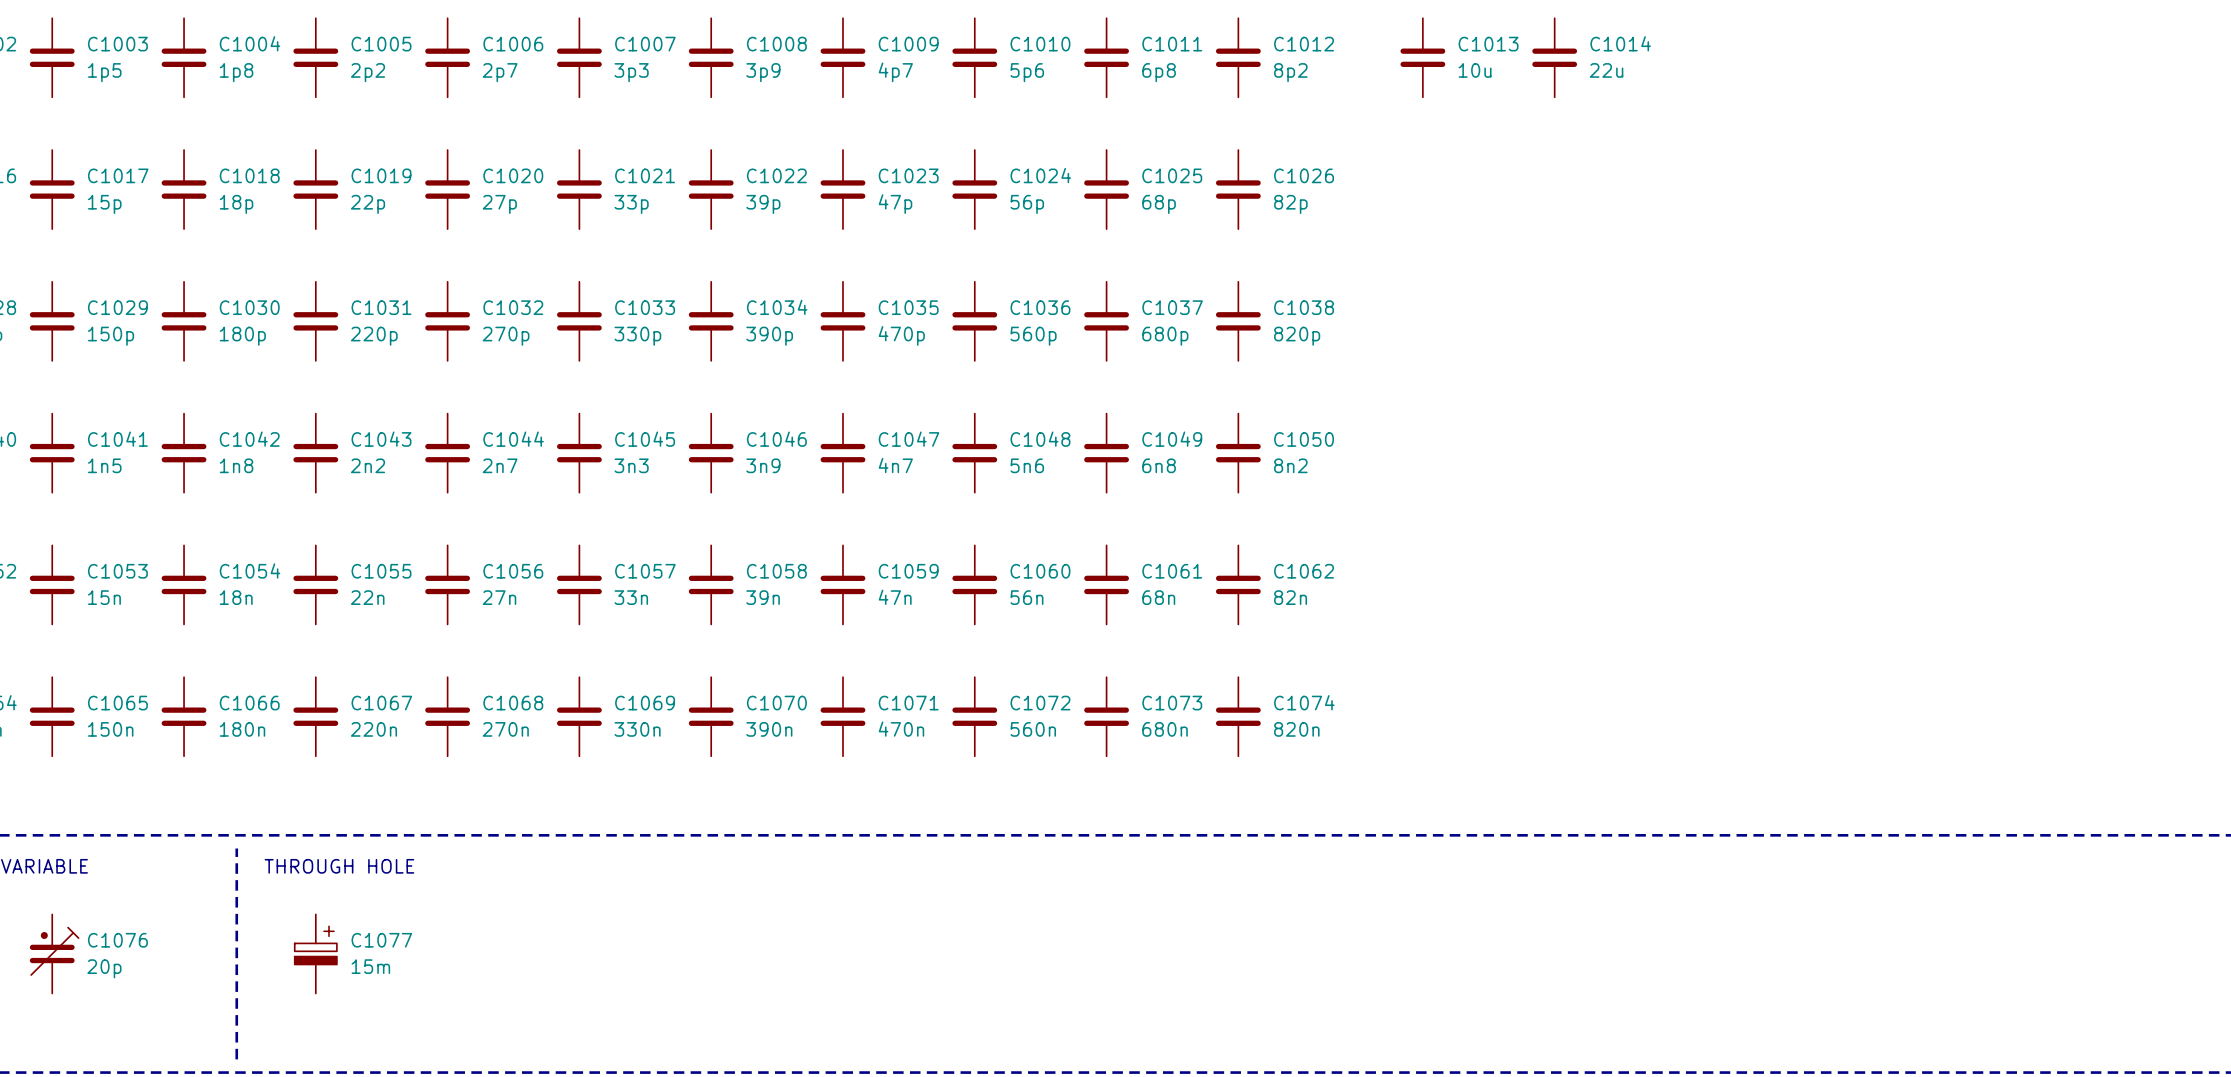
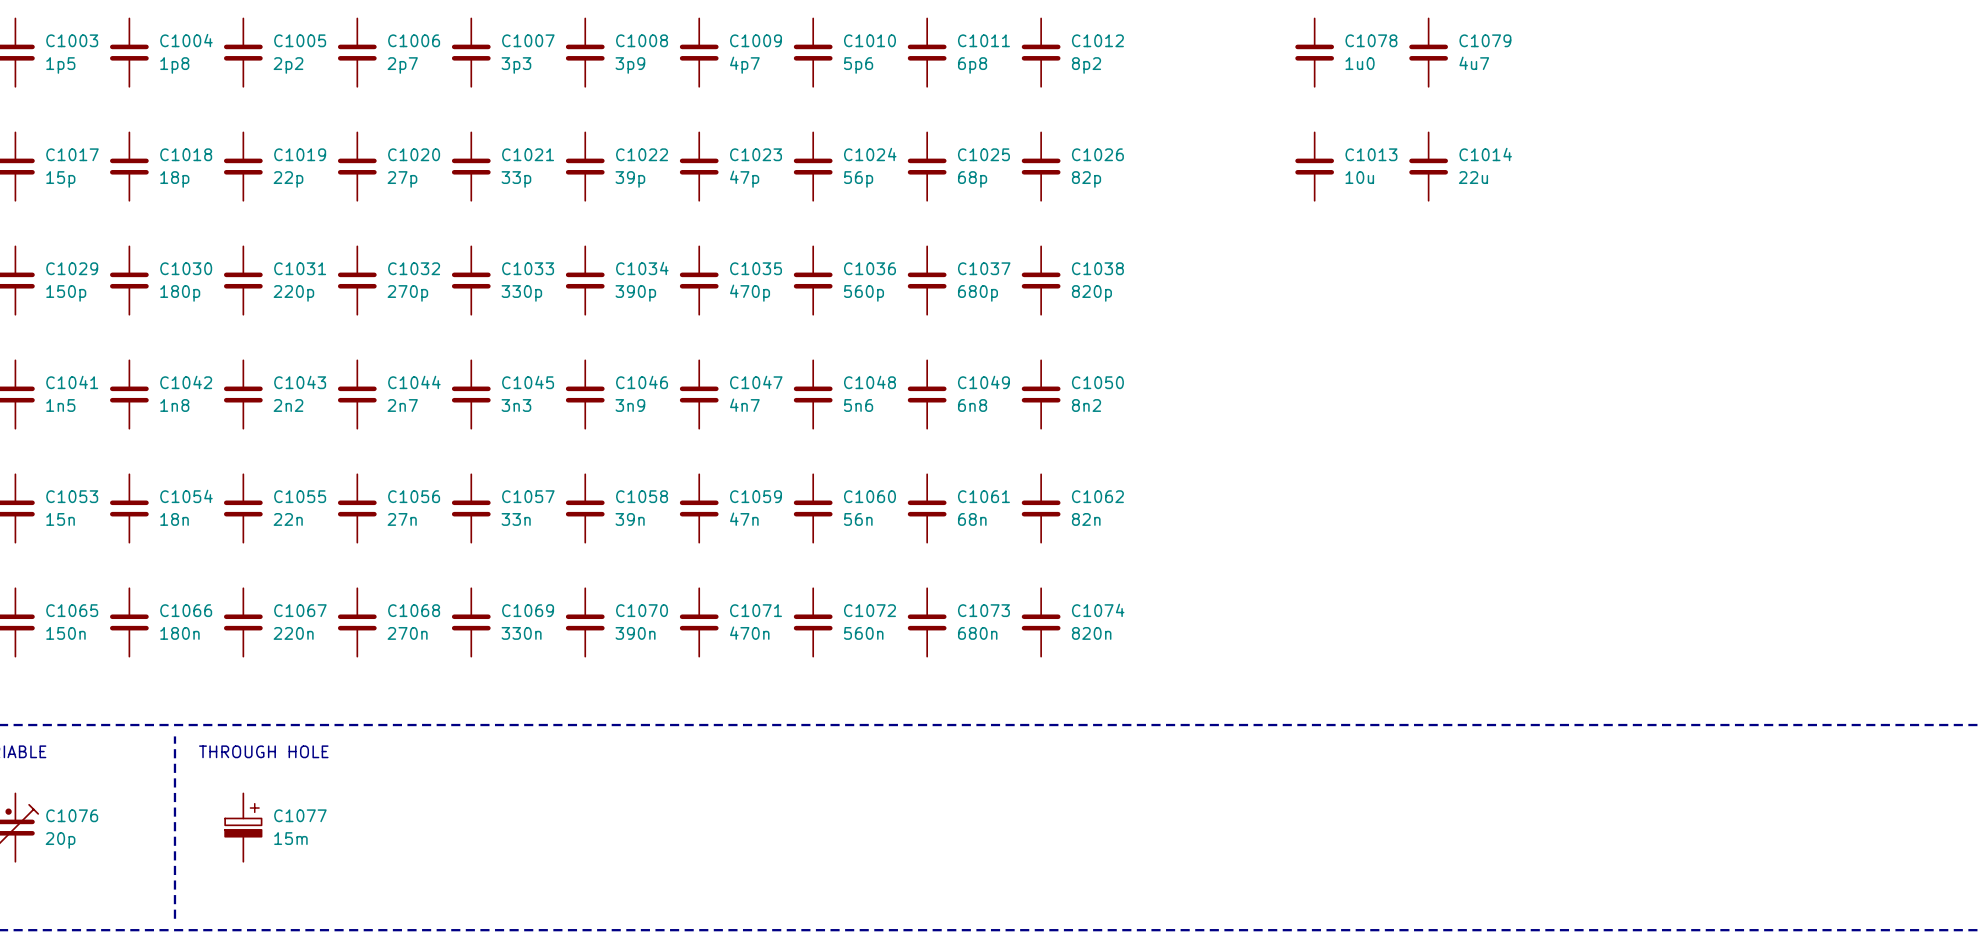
C1014 name: C1014 (1620, 43) -> C1078 (1371, 40)
C1013 position: (1422, 57) -> (1314, 166)
C1079: none -> 4u7 (1428, 52)
C1014 value: 22u (1606, 70) -> 1u0 (1360, 63)
C1014: none -> 22u (1428, 166)

